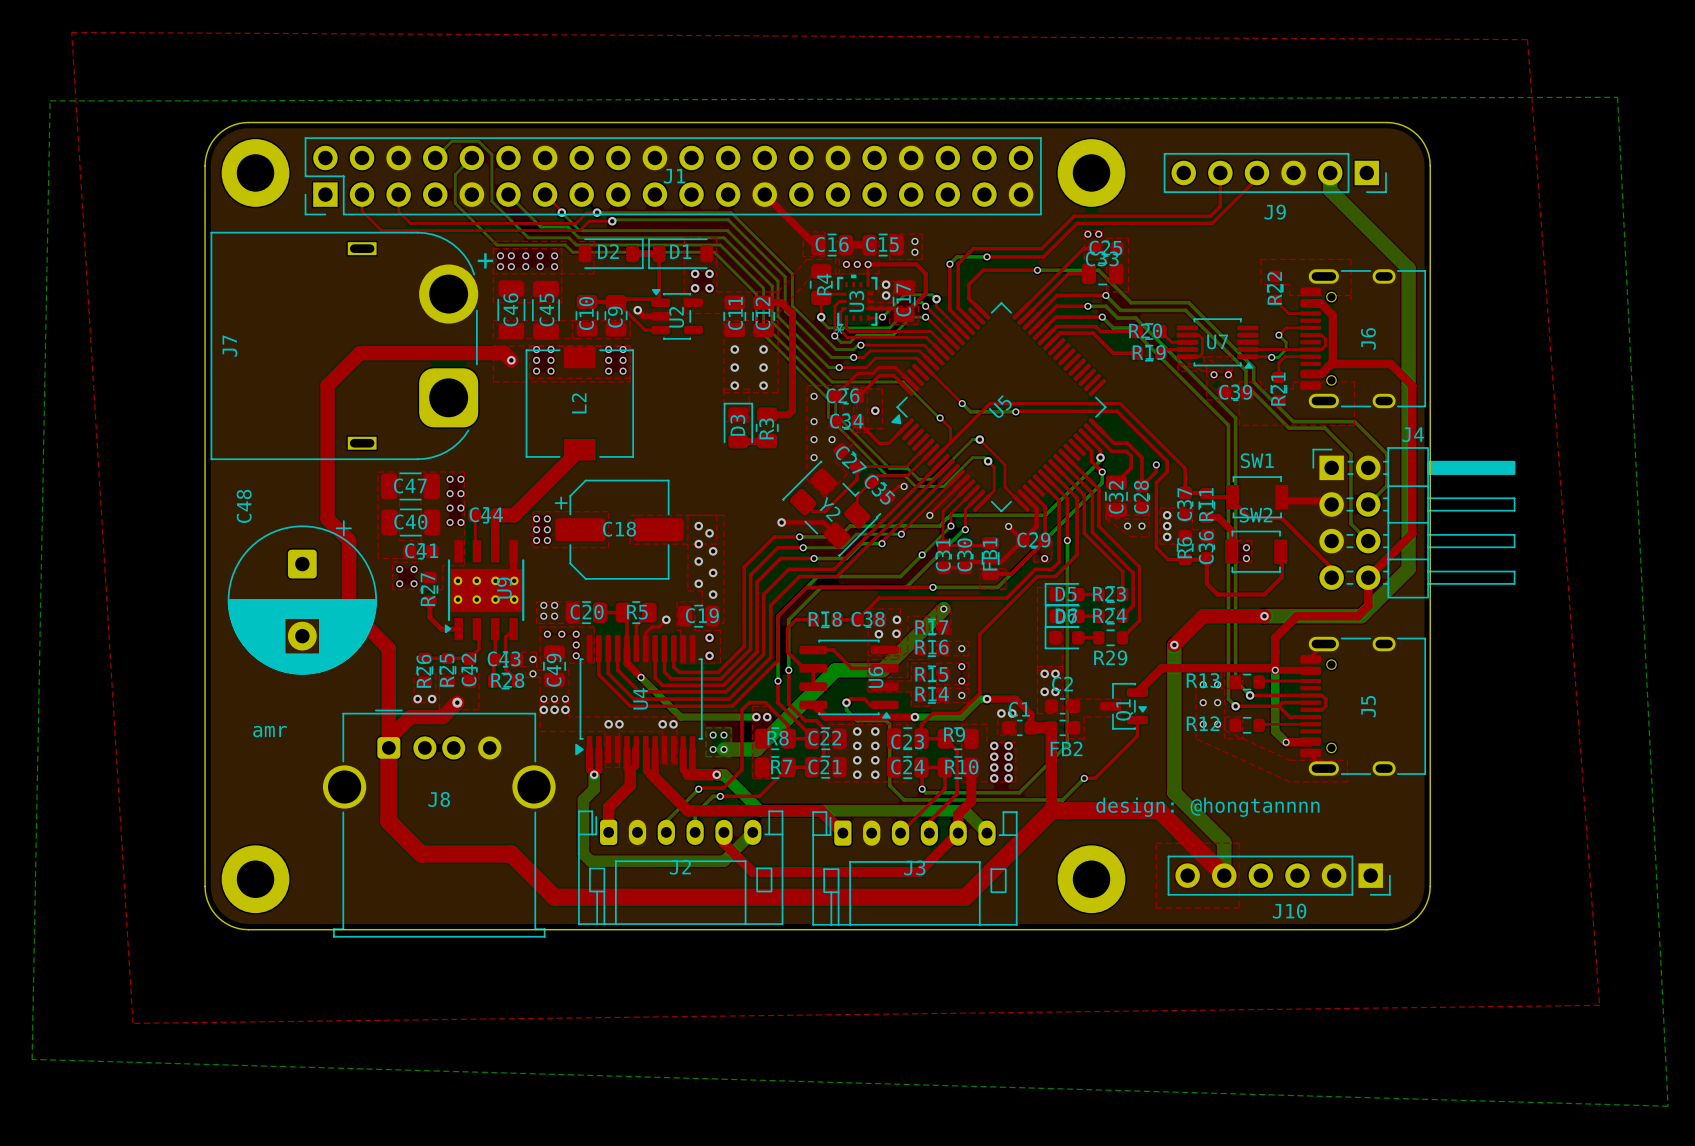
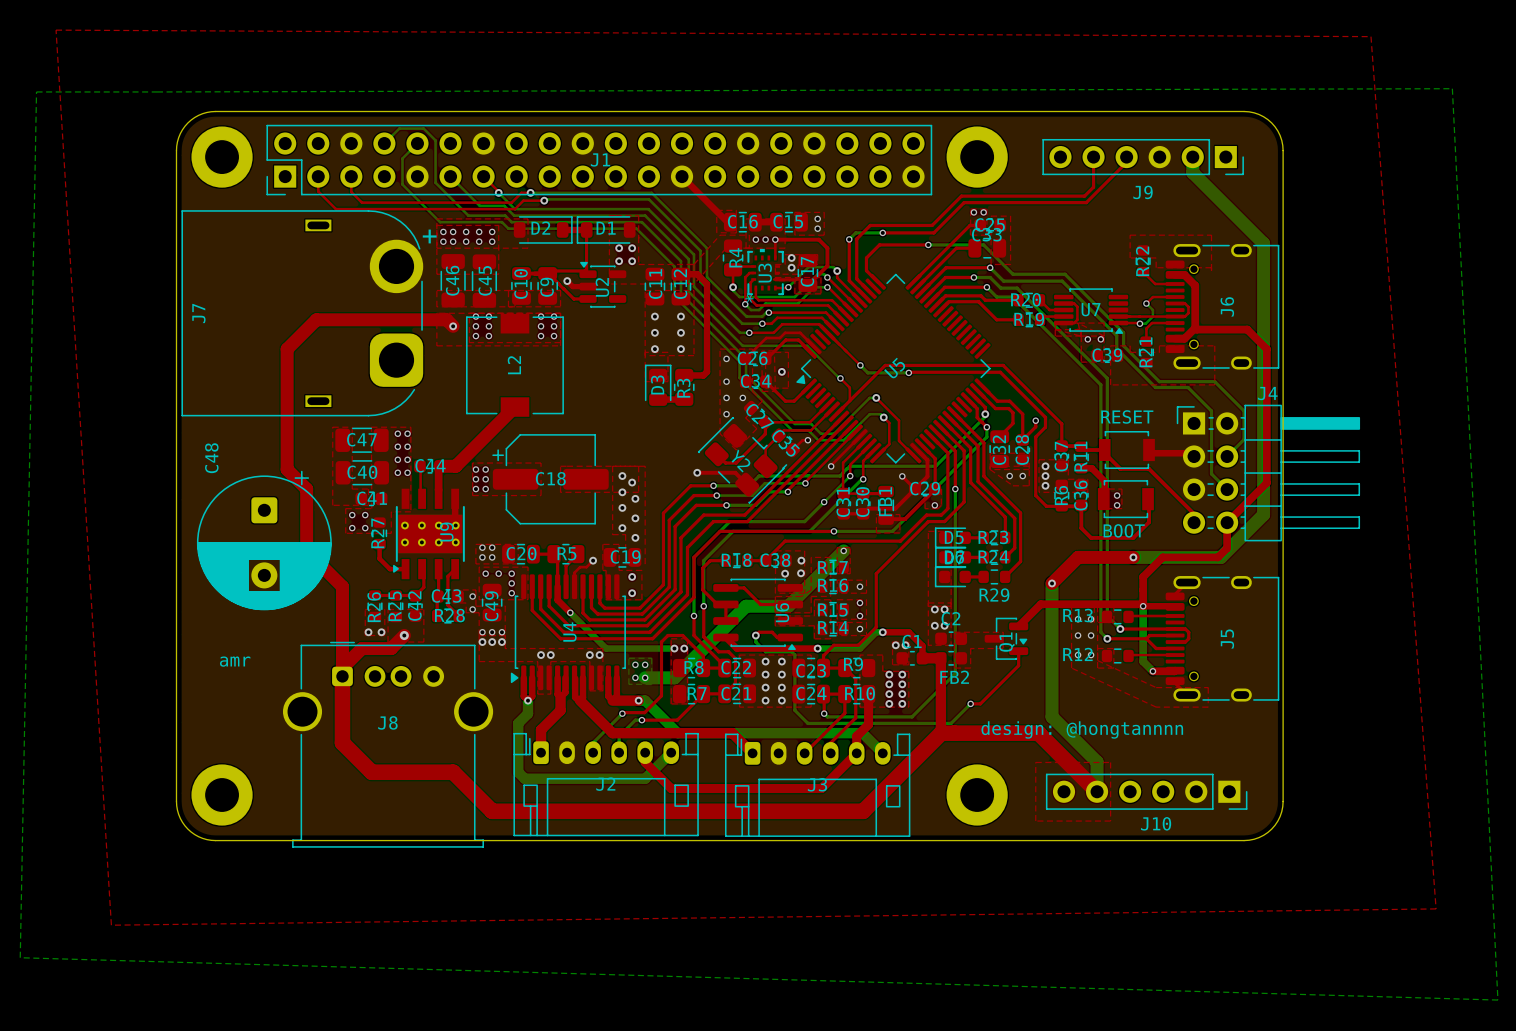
SW1 name: SW1 (1257, 460) -> RESET (1127, 416)
SW2 name: SW2 (1256, 515) -> BOOT (1124, 530)

